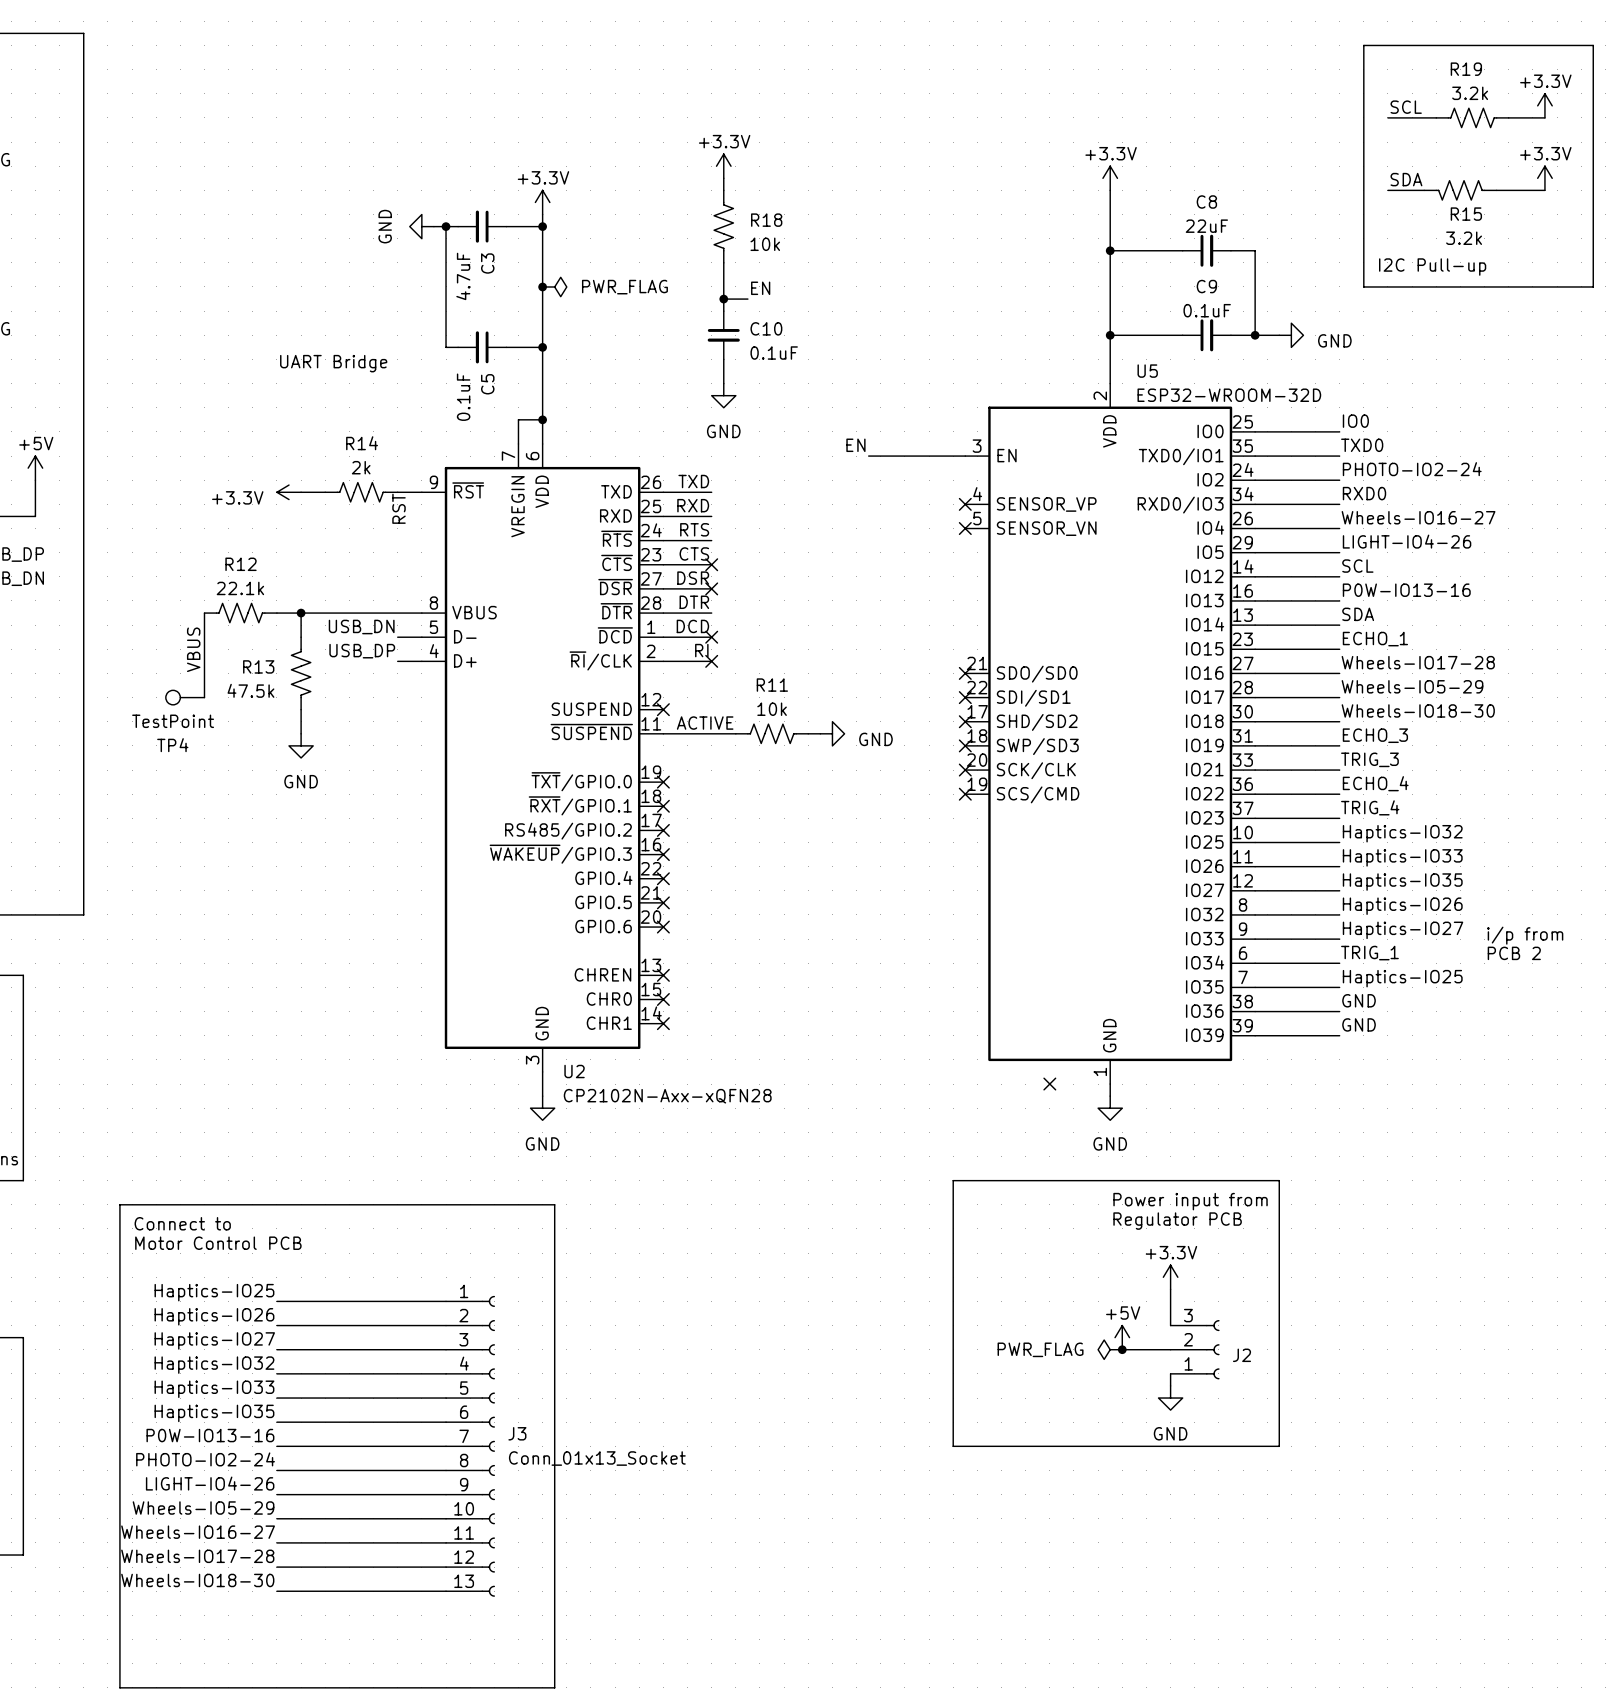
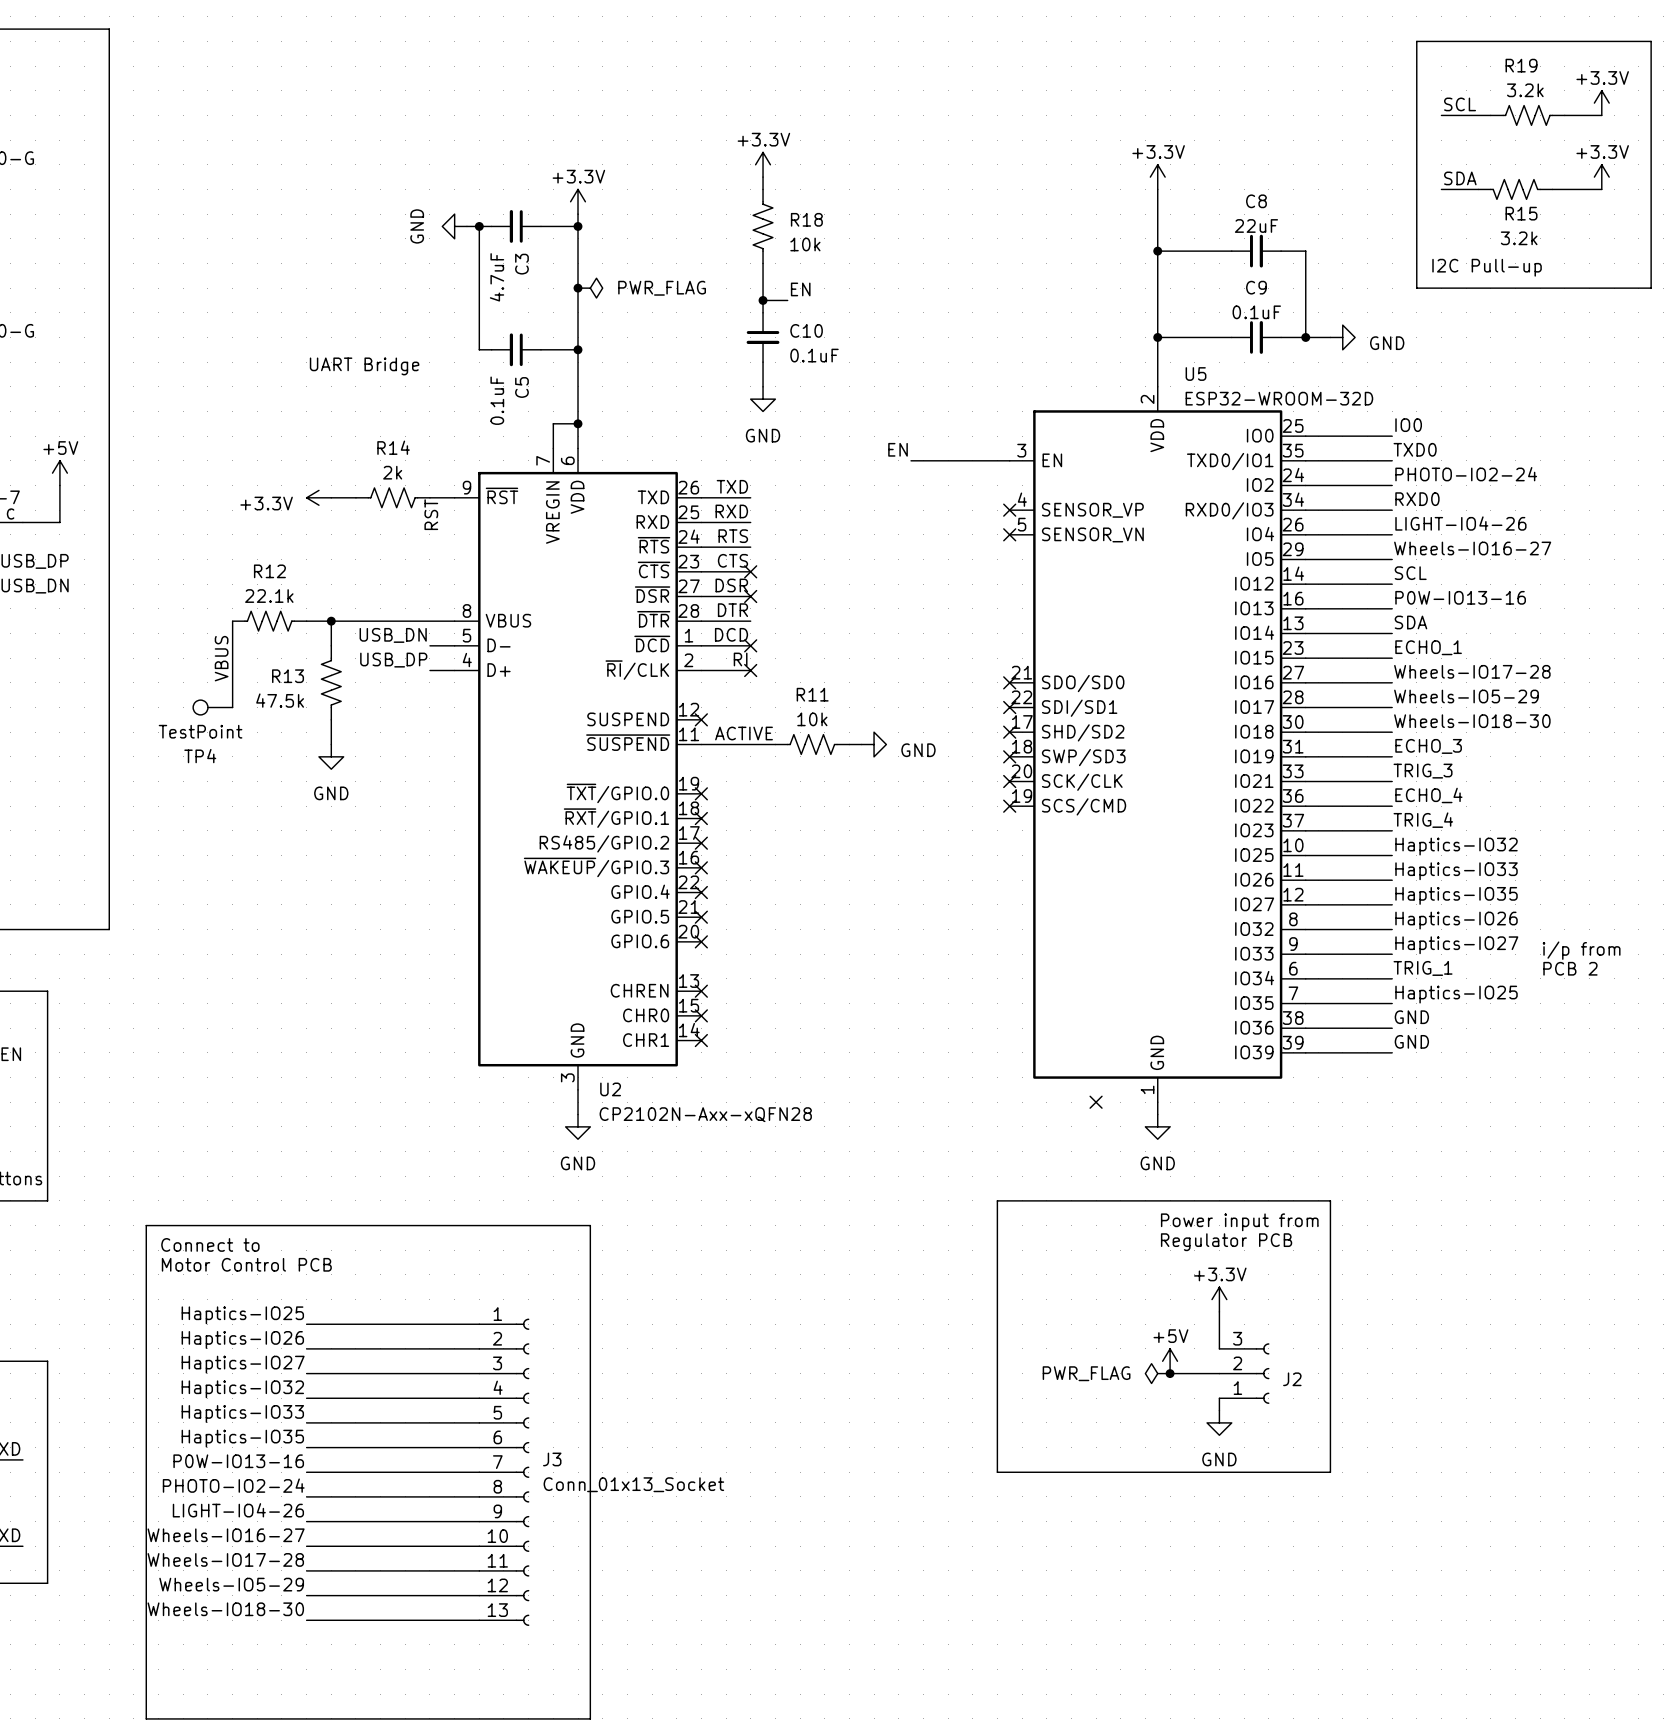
label: Wheels-IO16-27 (1418, 517) -> LIGHT-IO4-26 (1460, 523)
label: LIGHT-IO4-26 (1407, 541) -> Wheels-IO16-27 (1472, 548)
label: Wheels-IO5-29 (203, 1508) -> Wheels-IO16-27 (226, 1535)
label: Wheels-IO16-27 (198, 1532) -> Wheels-IO17-28 (225, 1559)
label: Wheels-IO17-28 (197, 1556) -> Wheels-IO5-29 (231, 1584)

